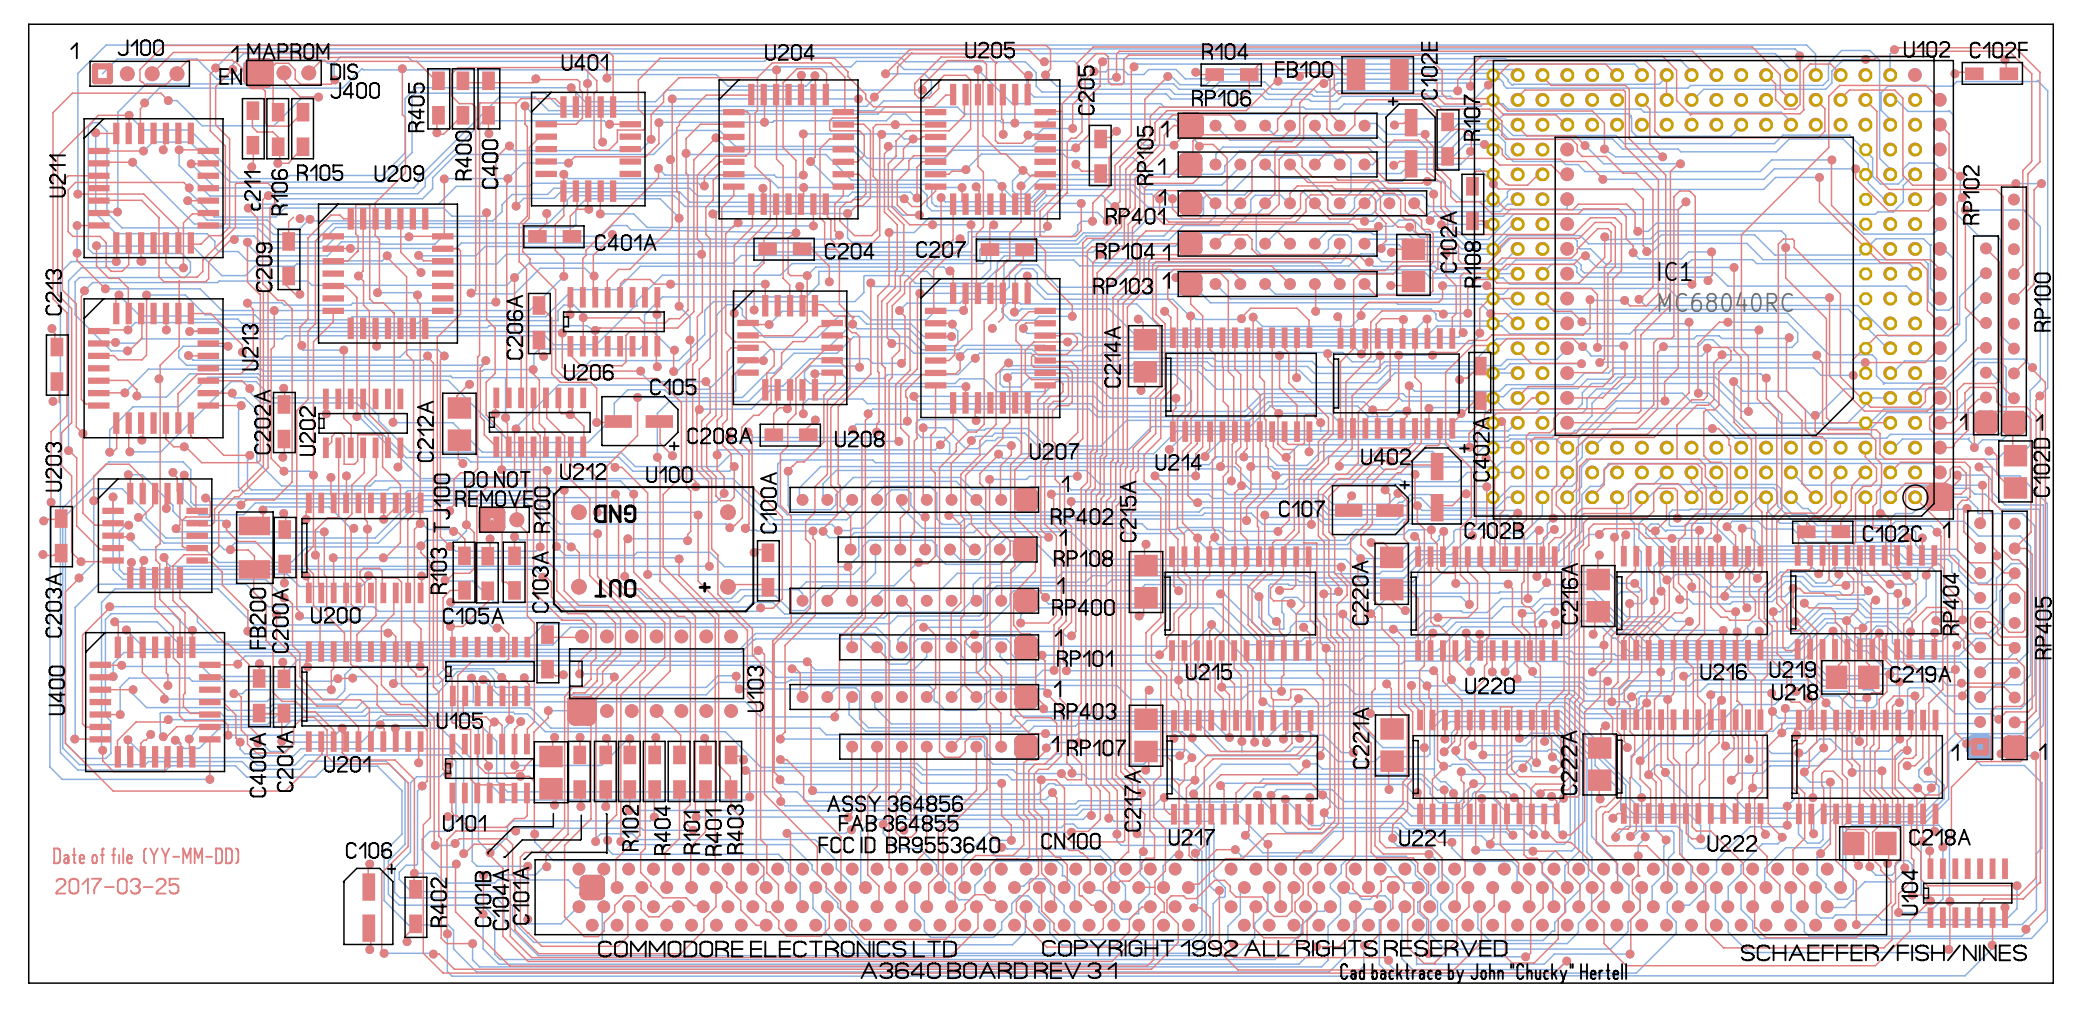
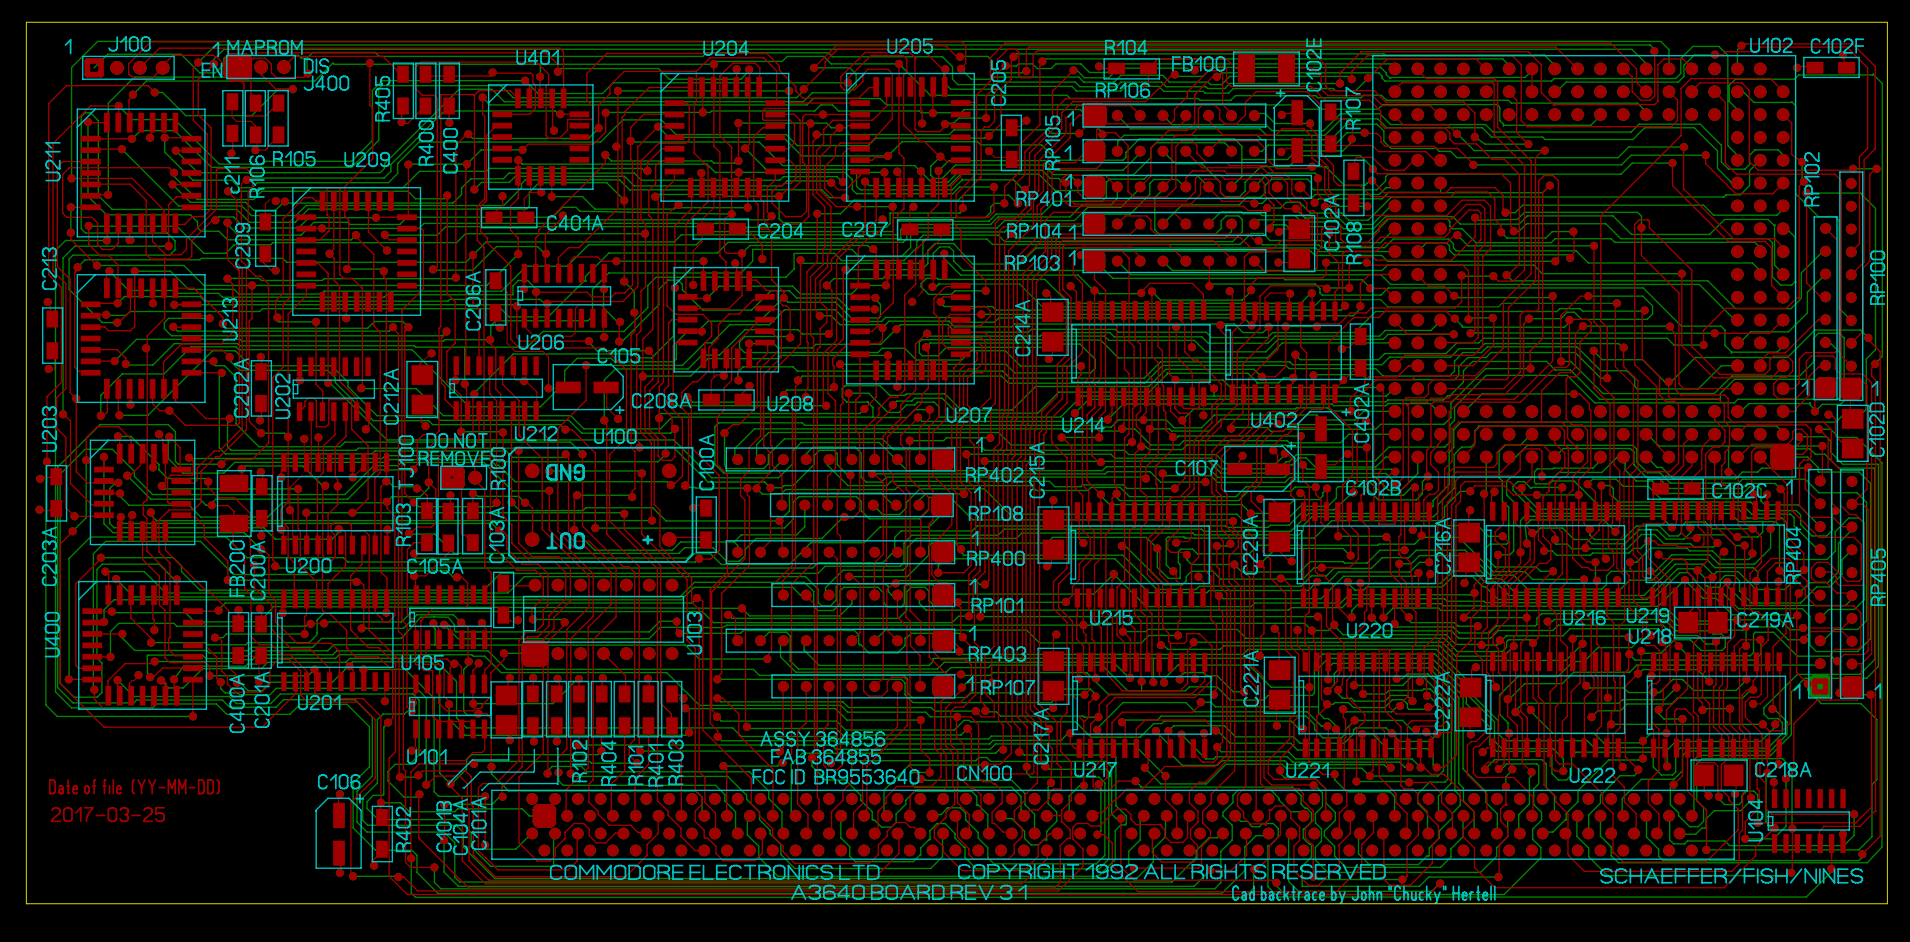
IC1: MC68040RC (1704, 286) -> none

